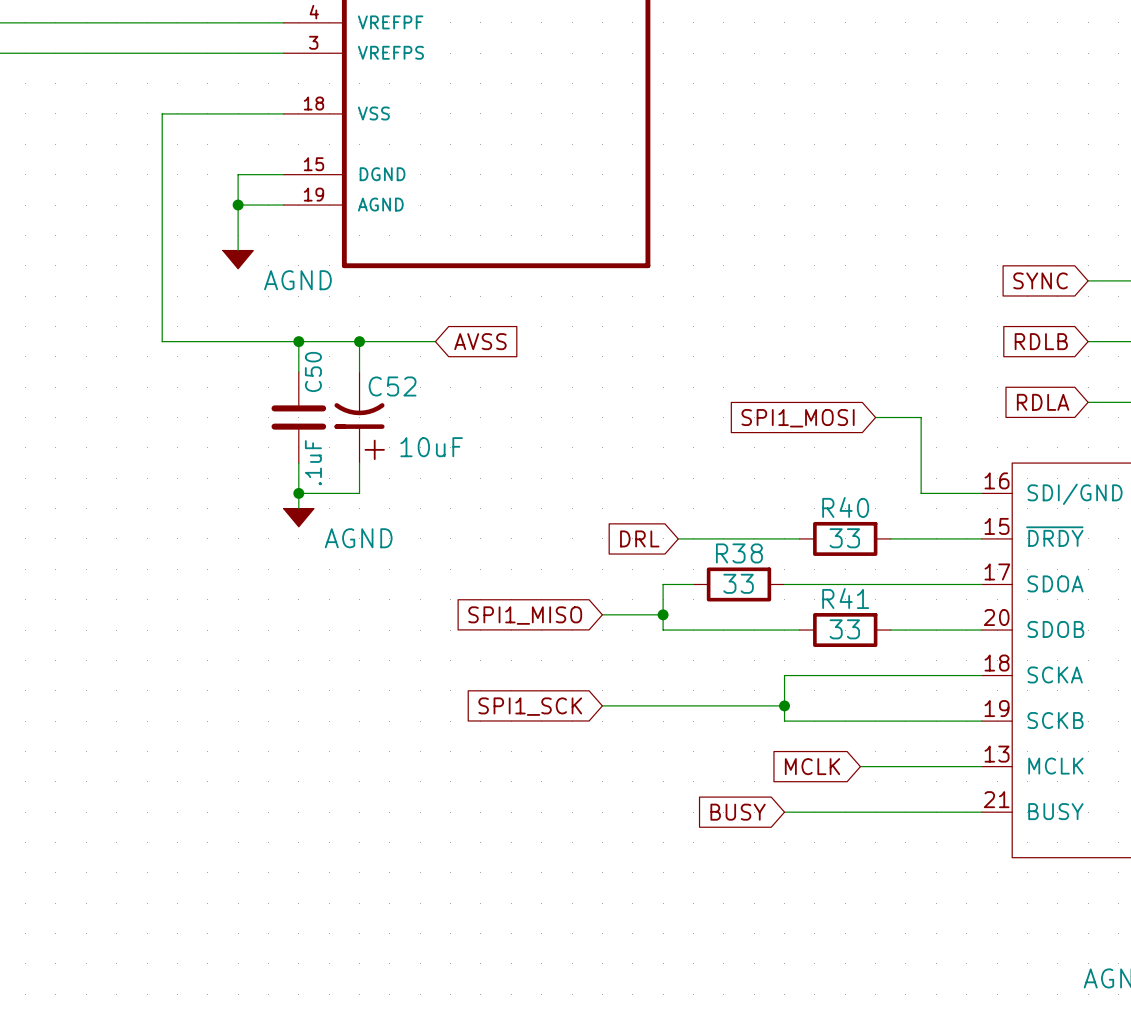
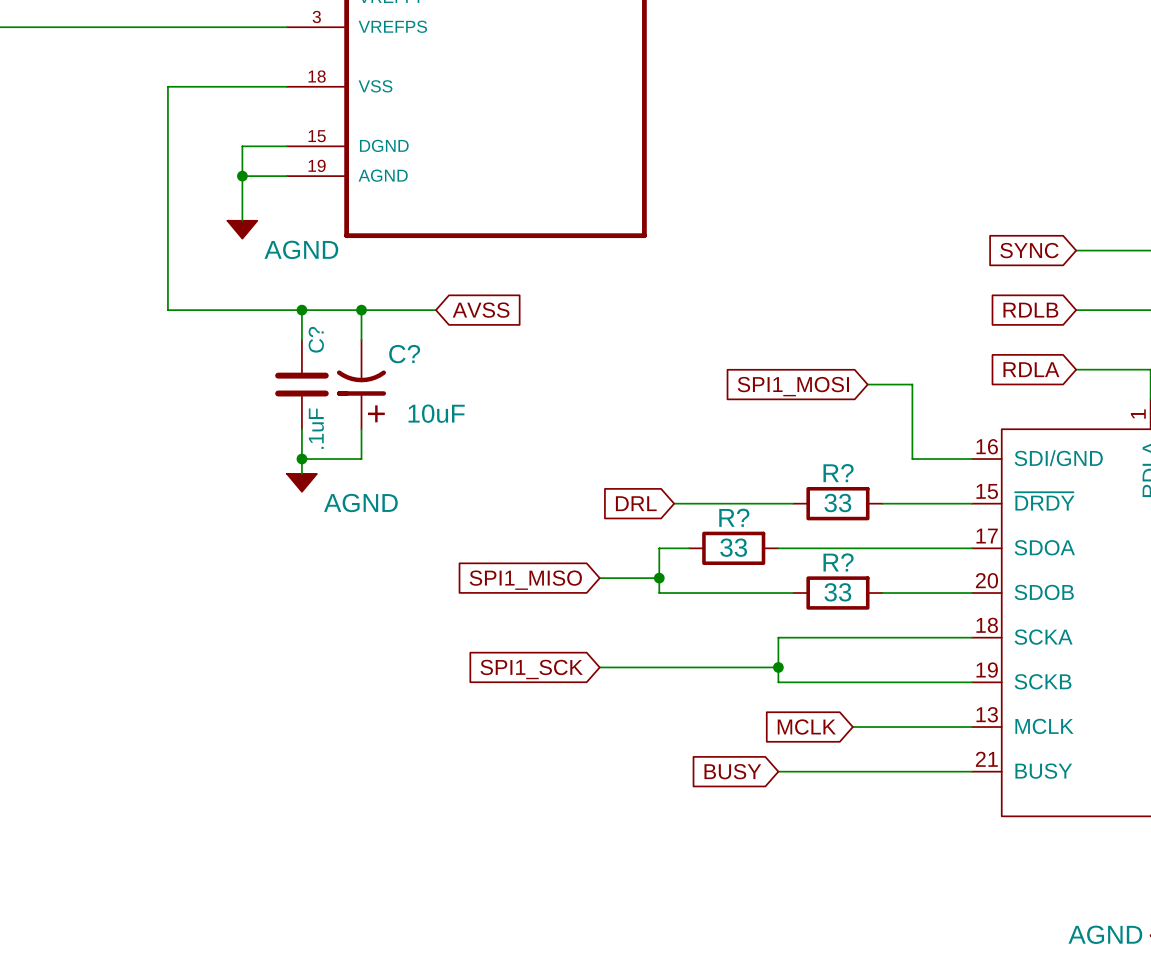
C50 name: C50 (313, 371) -> C? (316, 339)
C52 name: C52 (392, 386) -> C? (404, 354)
R40 name: R40 (845, 507) -> R? (838, 473)
R38 name: R38 (739, 553) -> R? (734, 517)
R41 name: R41 (845, 598) -> R? (838, 562)

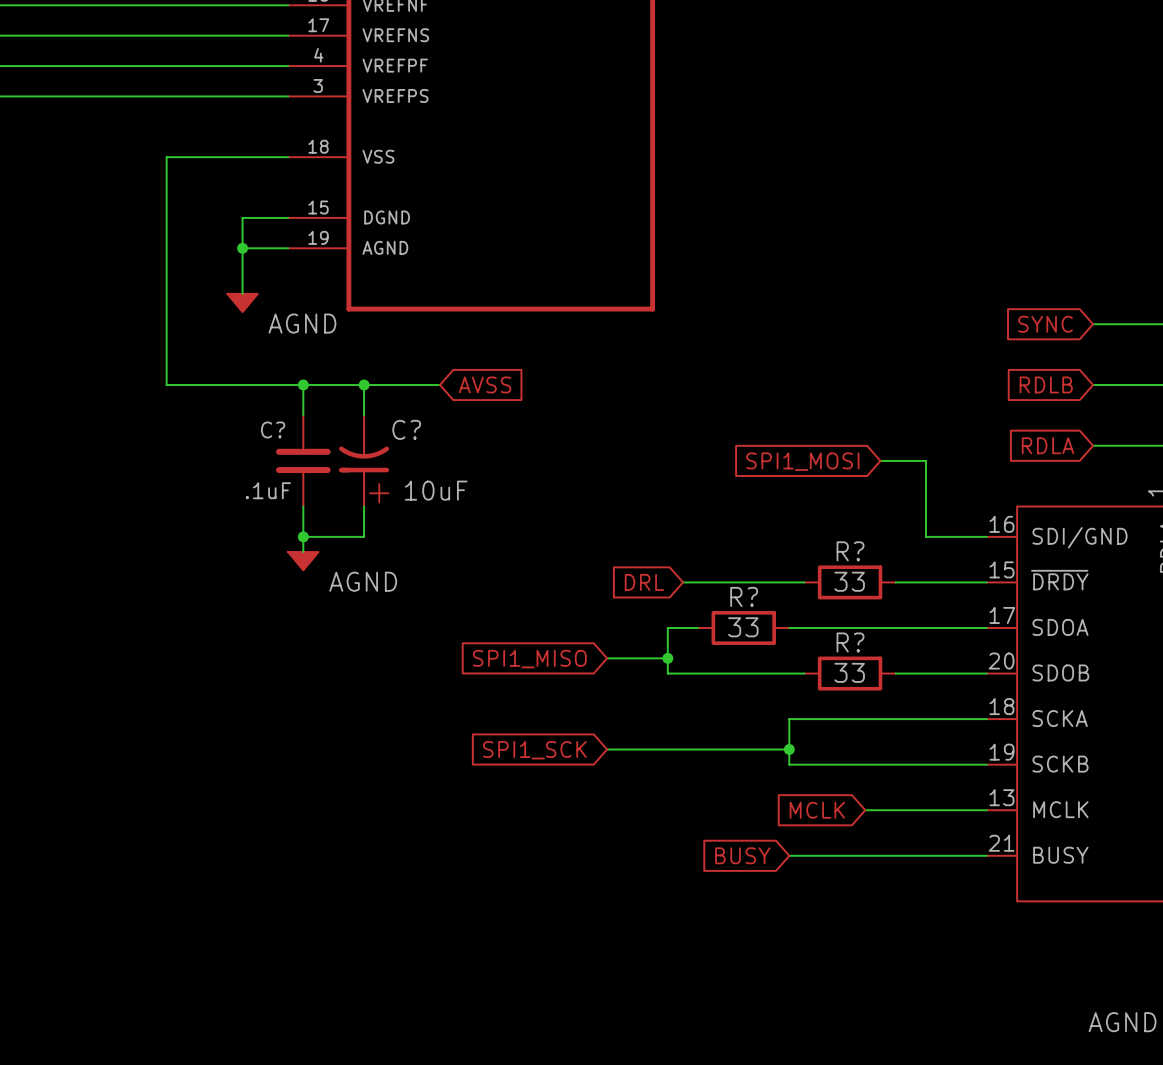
C? name rotation: 0° (316, 339) -> 90° clockwise (273, 429)
C? name position: C? (316, 339) -> C? (273, 429)
C? value rotation: 0° (316, 428) -> 90° clockwise (268, 490)

